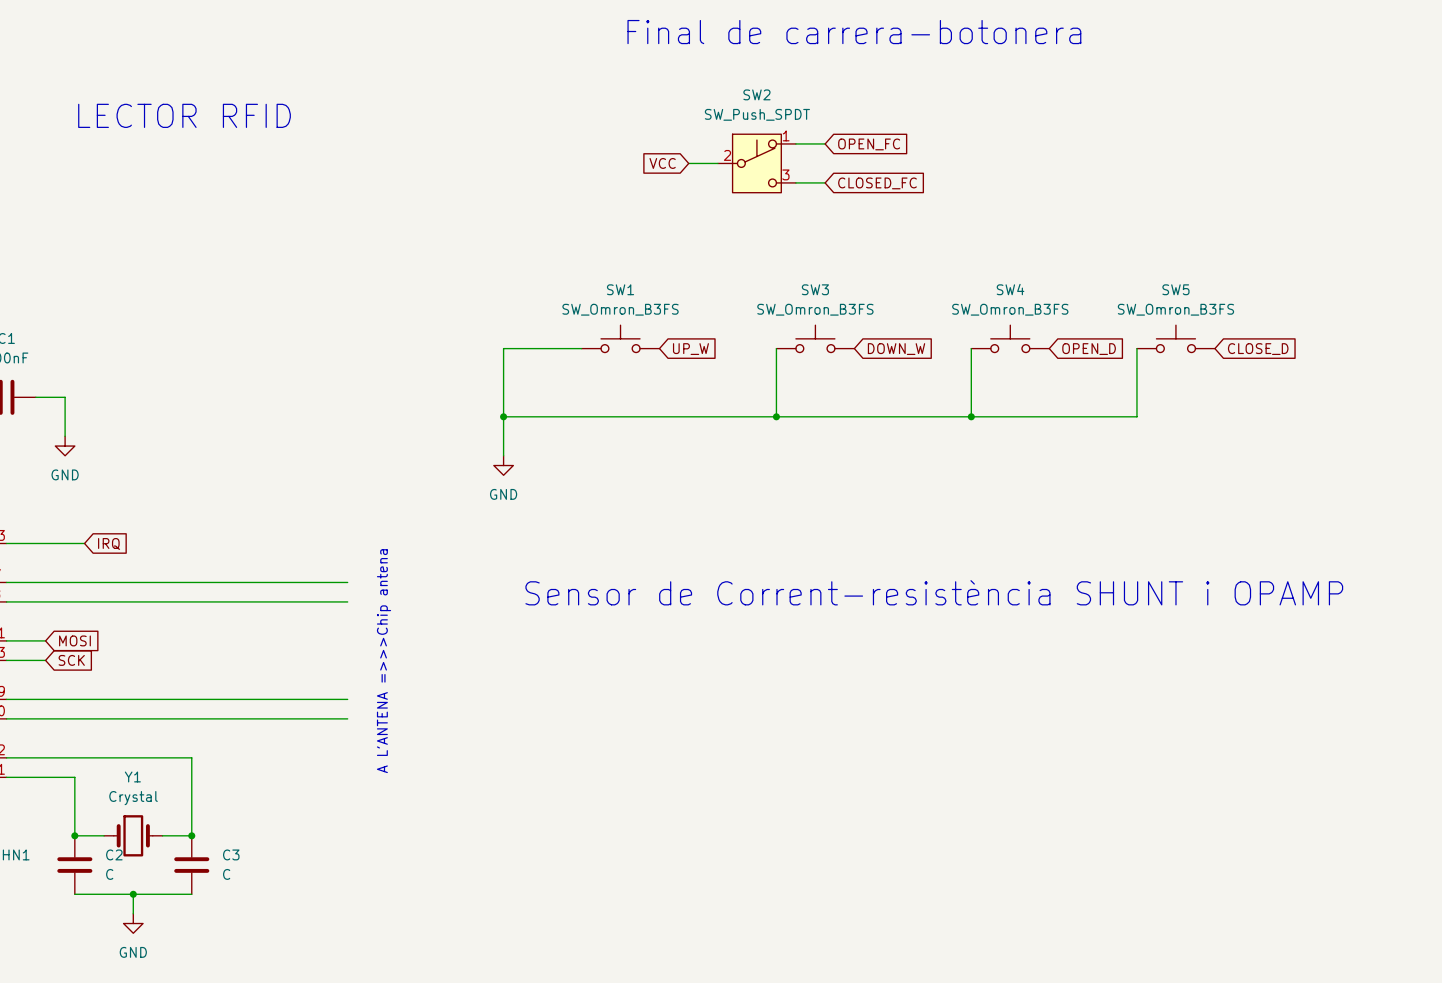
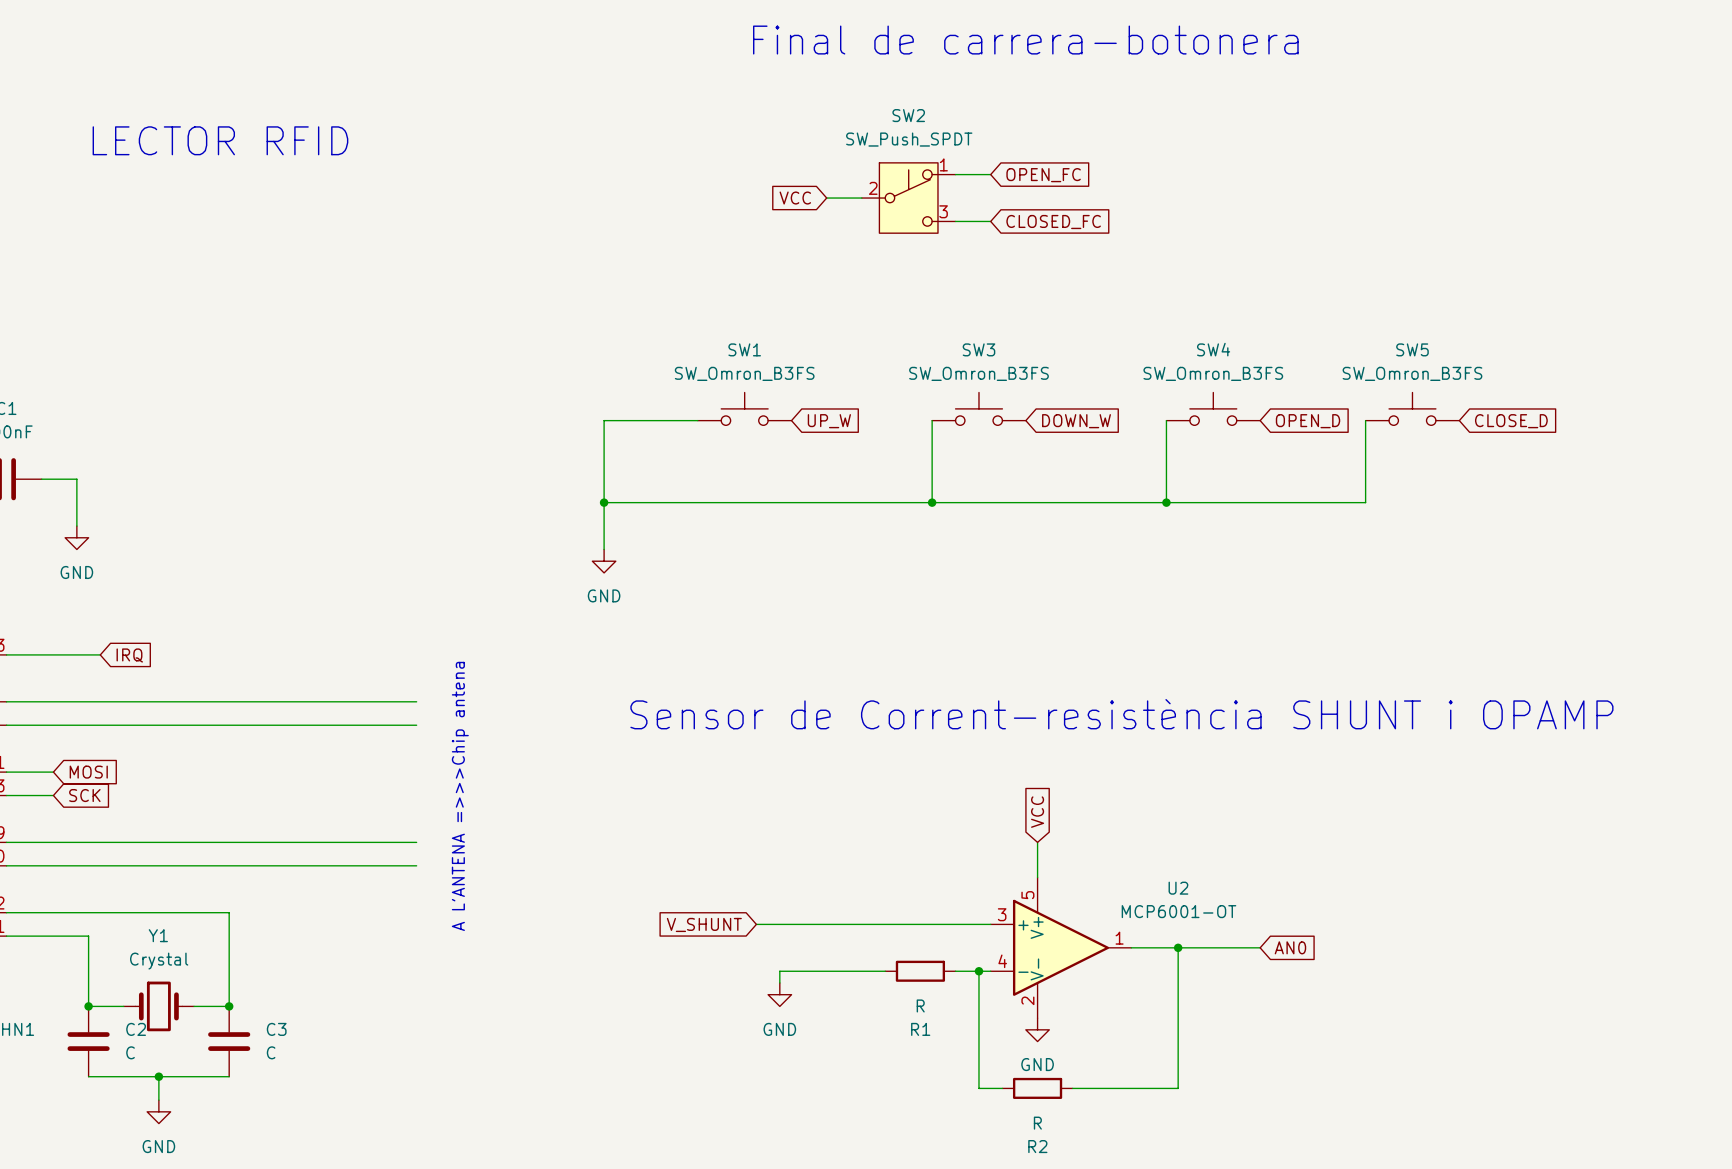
global label: none -> VCC (1037, 812)
wire: none -> (1037, 842) (1037, 877)
wire: none -> (756, 924) (990, 924)
global label: none -> V_SHUNT (704, 924)
U2: none -> MCP6001-OT (1061, 947)
wire: none -> (1131, 947) (1260, 947)
wire: none -> (1178, 947) (1178, 1088) (1072, 1088)
junction: none -> (1178, 947)
global label: none -> AN0 (1290, 947)
wire: none -> (885, 971) (779, 971) (779, 982)
R1: none -> R (920, 971)
wire: none -> (955, 971) (990, 971)
wire: none -> (978, 971) (978, 1088) (1002, 1088)
junction: none -> (978, 971)
power symbol: none -> GND (779, 994)
power symbol: none -> GND (1037, 1029)
R2: none -> R (1037, 1088)

